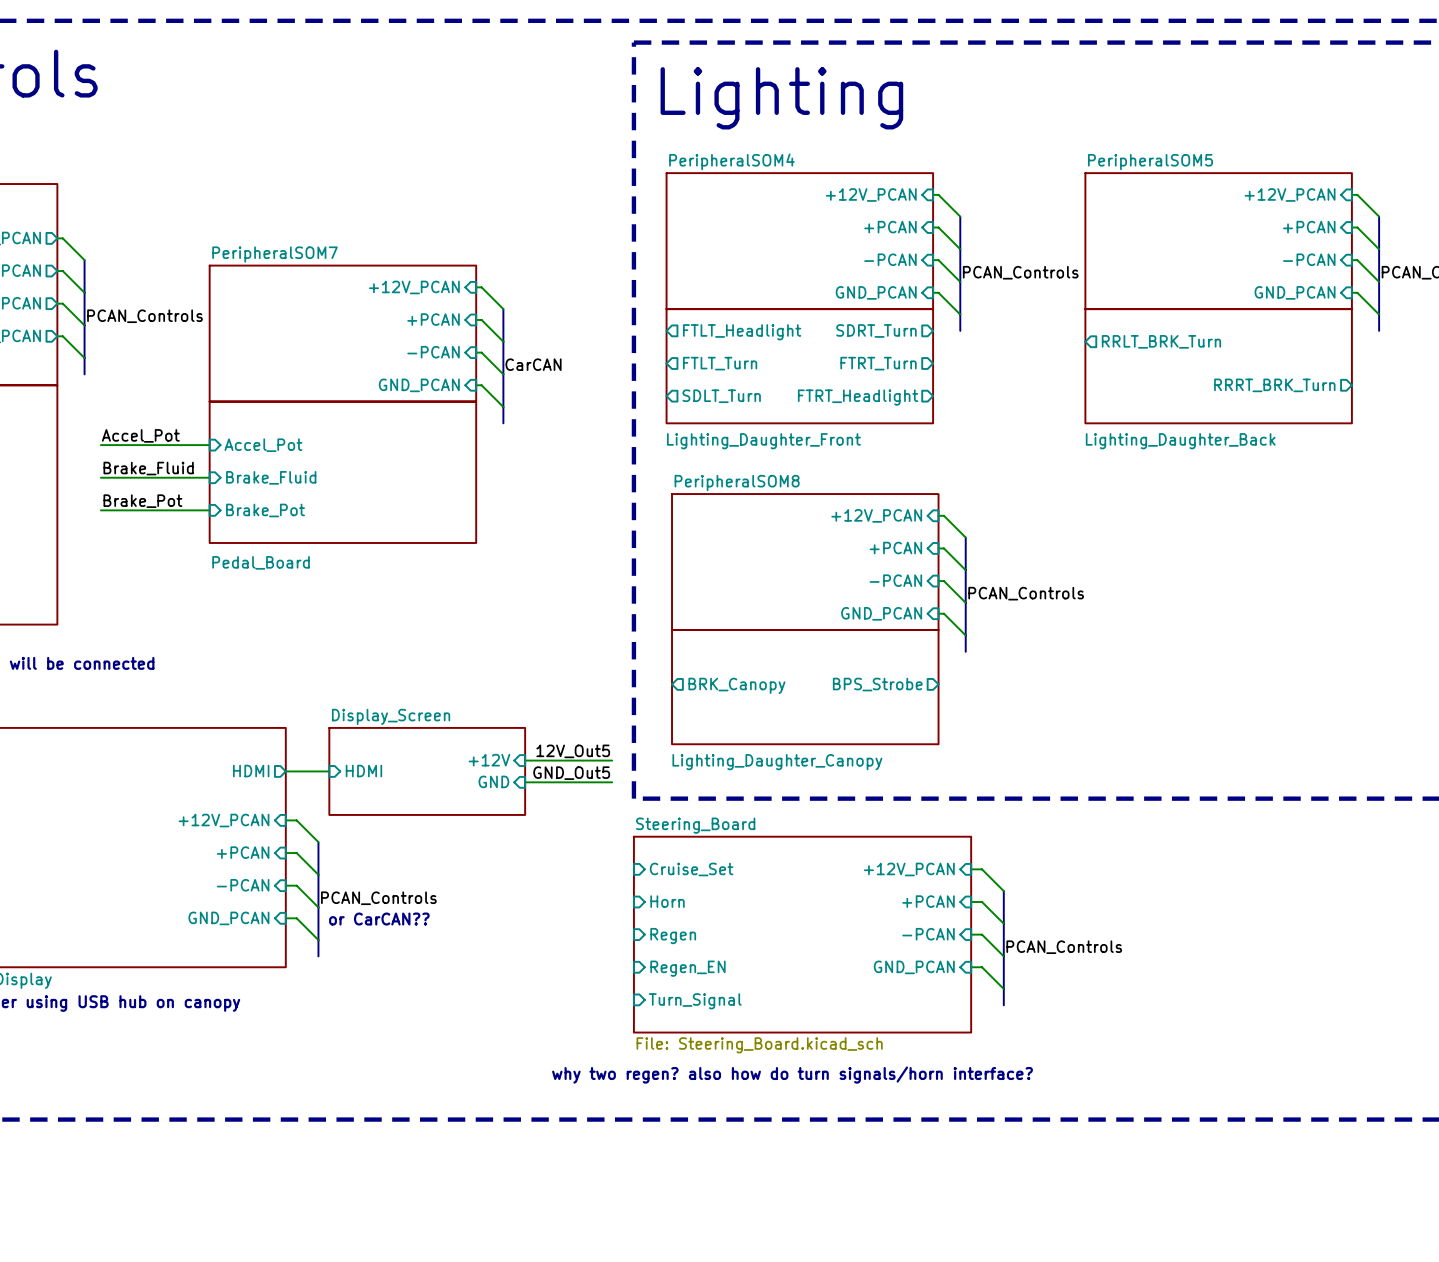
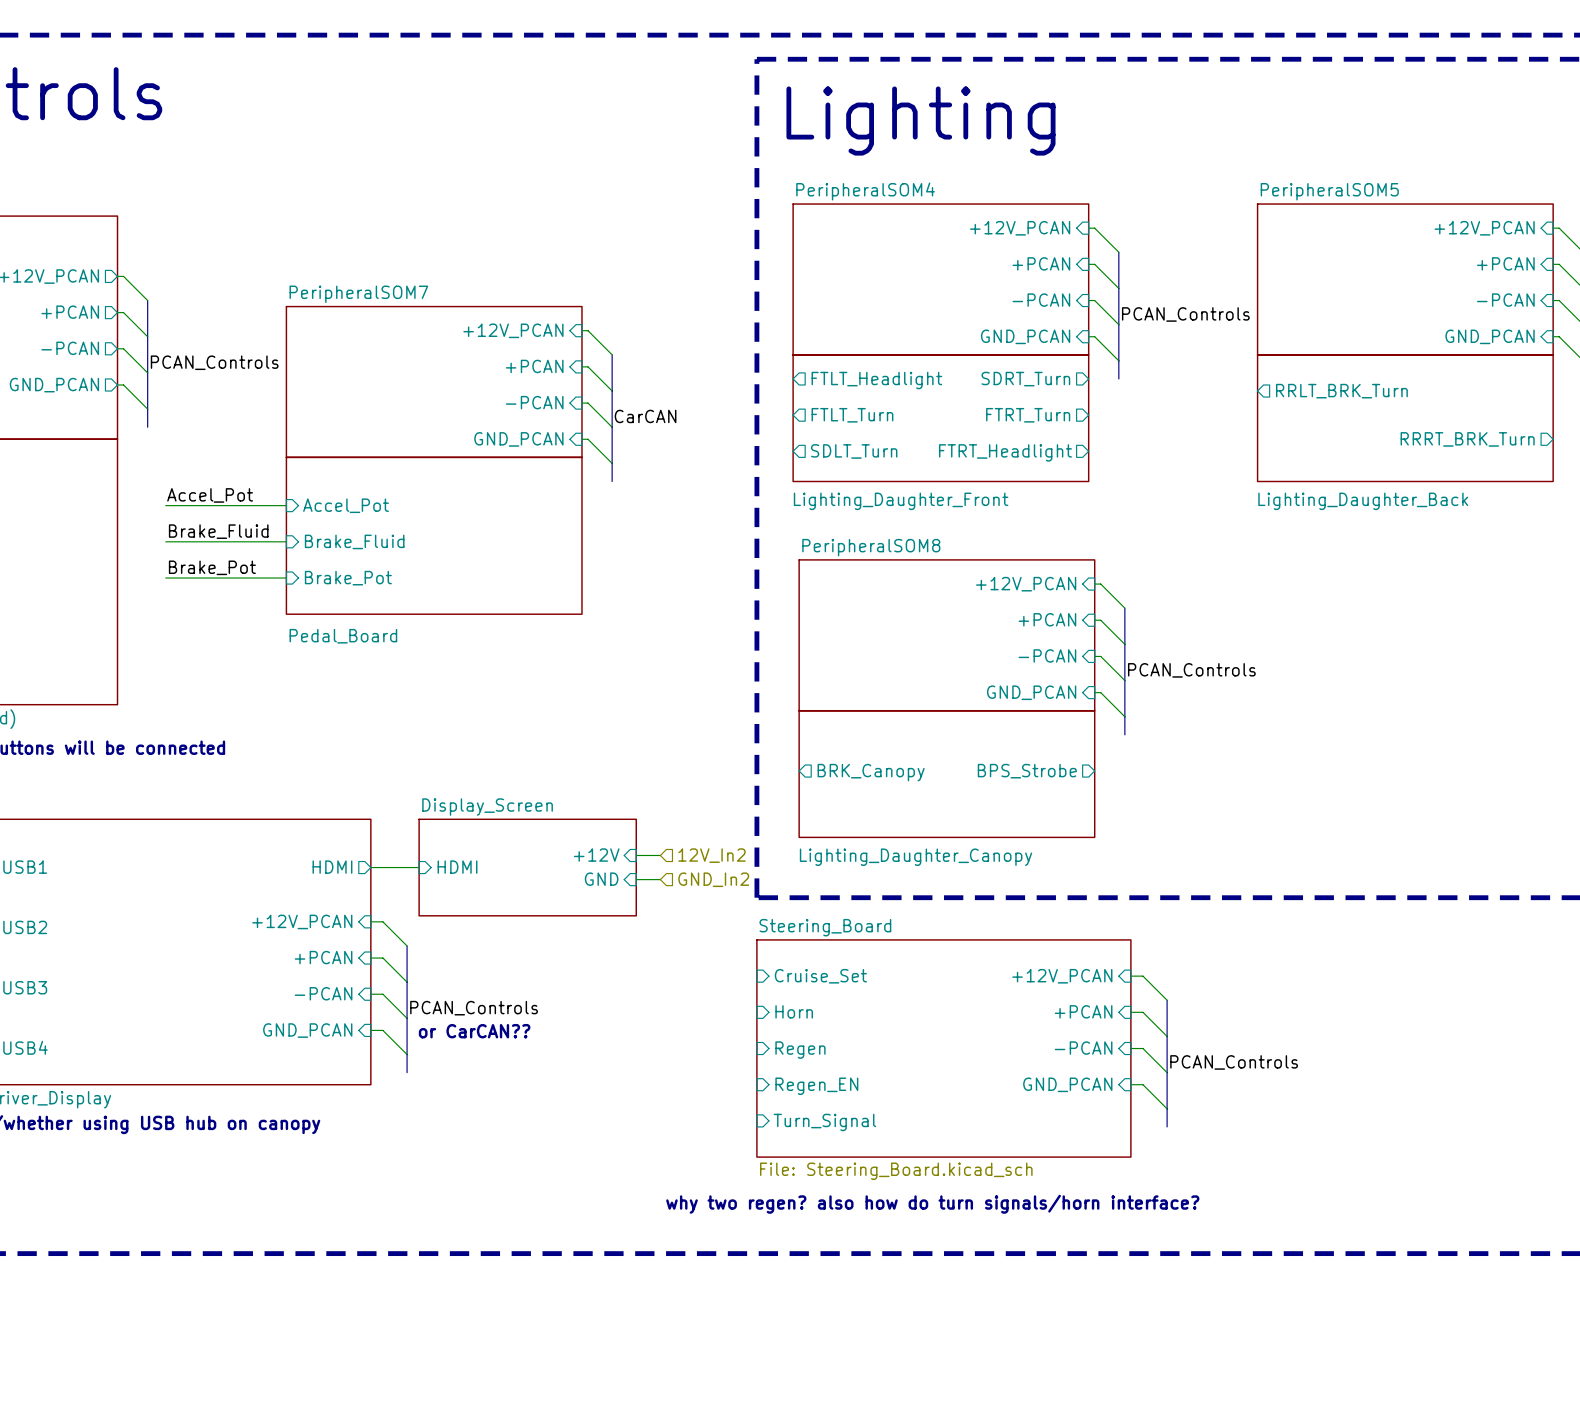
label: 12V_Out5 (573, 751) -> none
wire: (546, 760) (612, 760) -> none
hierarchical label: none -> 12V_In2 (712, 855)
label: GND_Out5 (571, 773) -> none
wire: (546, 782) (612, 782) -> none
hierarchical label: none -> GND_In2 (713, 879)

